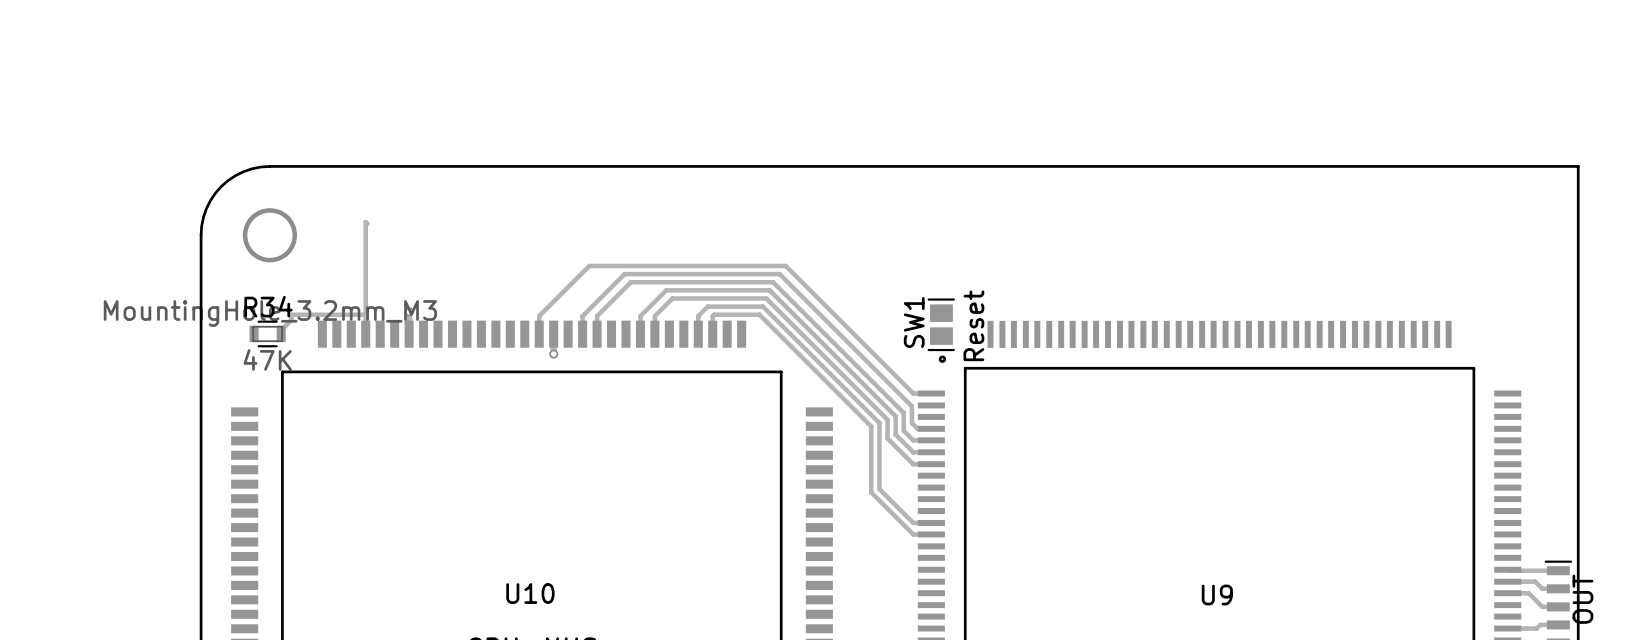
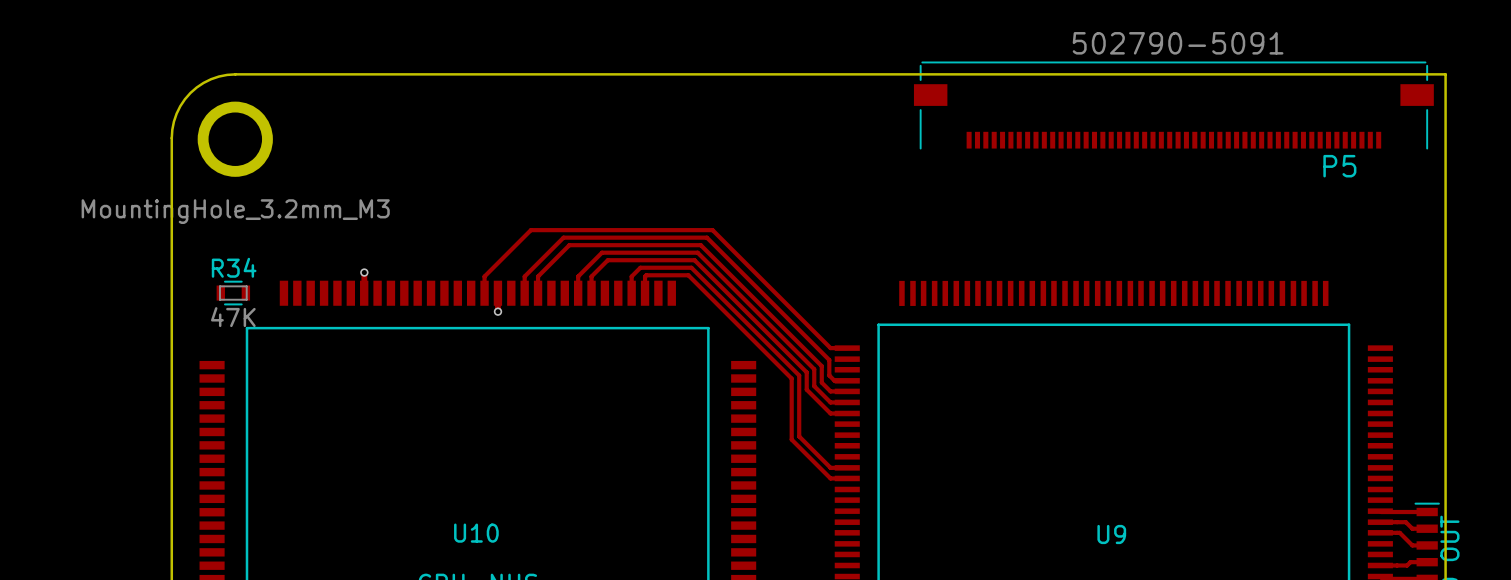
P5: none -> 502790-5091 (1173, 105)
board edge: (1578, 166) (269, 166) (243, 171) (221, 186) (206, 208) (201, 235) -> (1445, 138) (1445, 74) (235, 74) (218, 76) (203, 82) (190, 93) (180, 106) (172, 129) (171, 201)
part: none -> MountingHole_3.2mm_M3 (235, 139)
track: (367, 223) (365, 222) (365, 334) -> none
part: MountingHole_3.2mm_M3 (269, 235) -> none
track: (365, 316) (291, 314) (291, 320) (281, 330) (281, 333) -> none
SW1: Reset (941, 330) -> none

